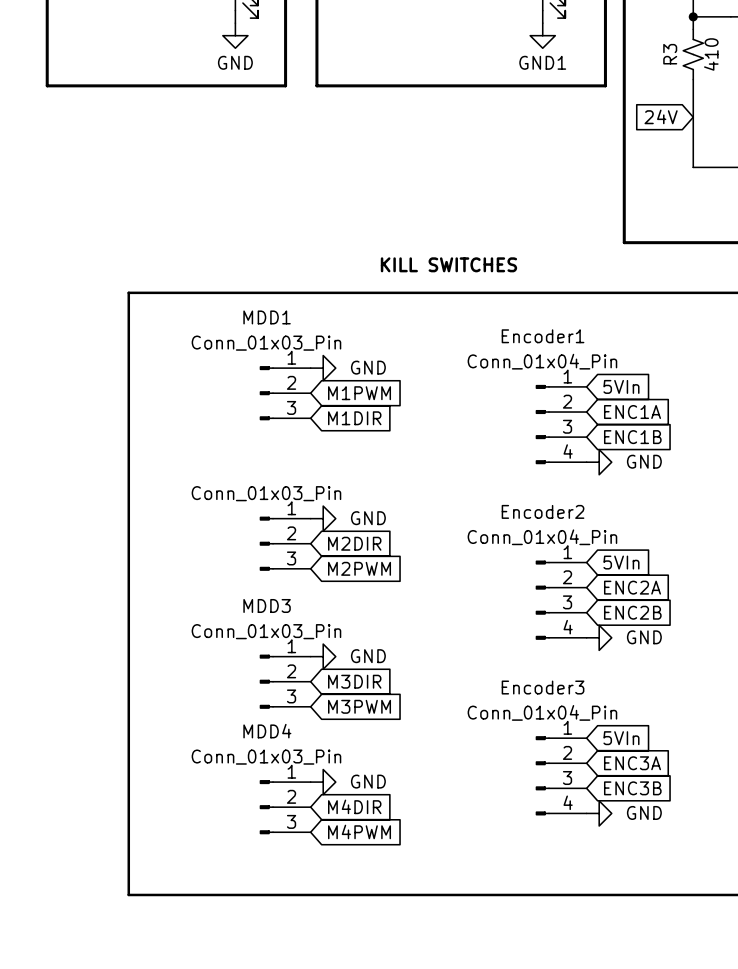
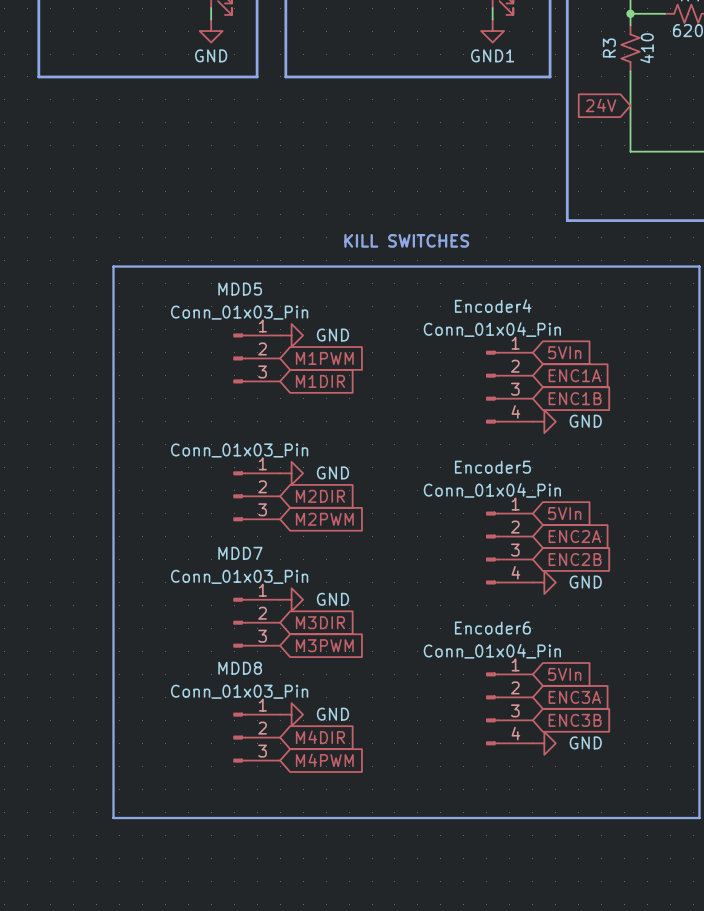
MDD1 name: MDD1 (267, 317) -> MDD5 (240, 289)
Encoder1 name: Encoder1 (543, 336) -> Encoder4 (493, 306)
Encoder2 name: Encoder2 (543, 511) -> Encoder5 (492, 467)
MDD3 name: MDD3 (267, 605) -> MDD7 (240, 553)
Encoder3 name: Encoder3 (543, 687) -> Encoder6 (492, 628)
MDD4 name: MDD4 (267, 731) -> MDD8 (240, 668)

